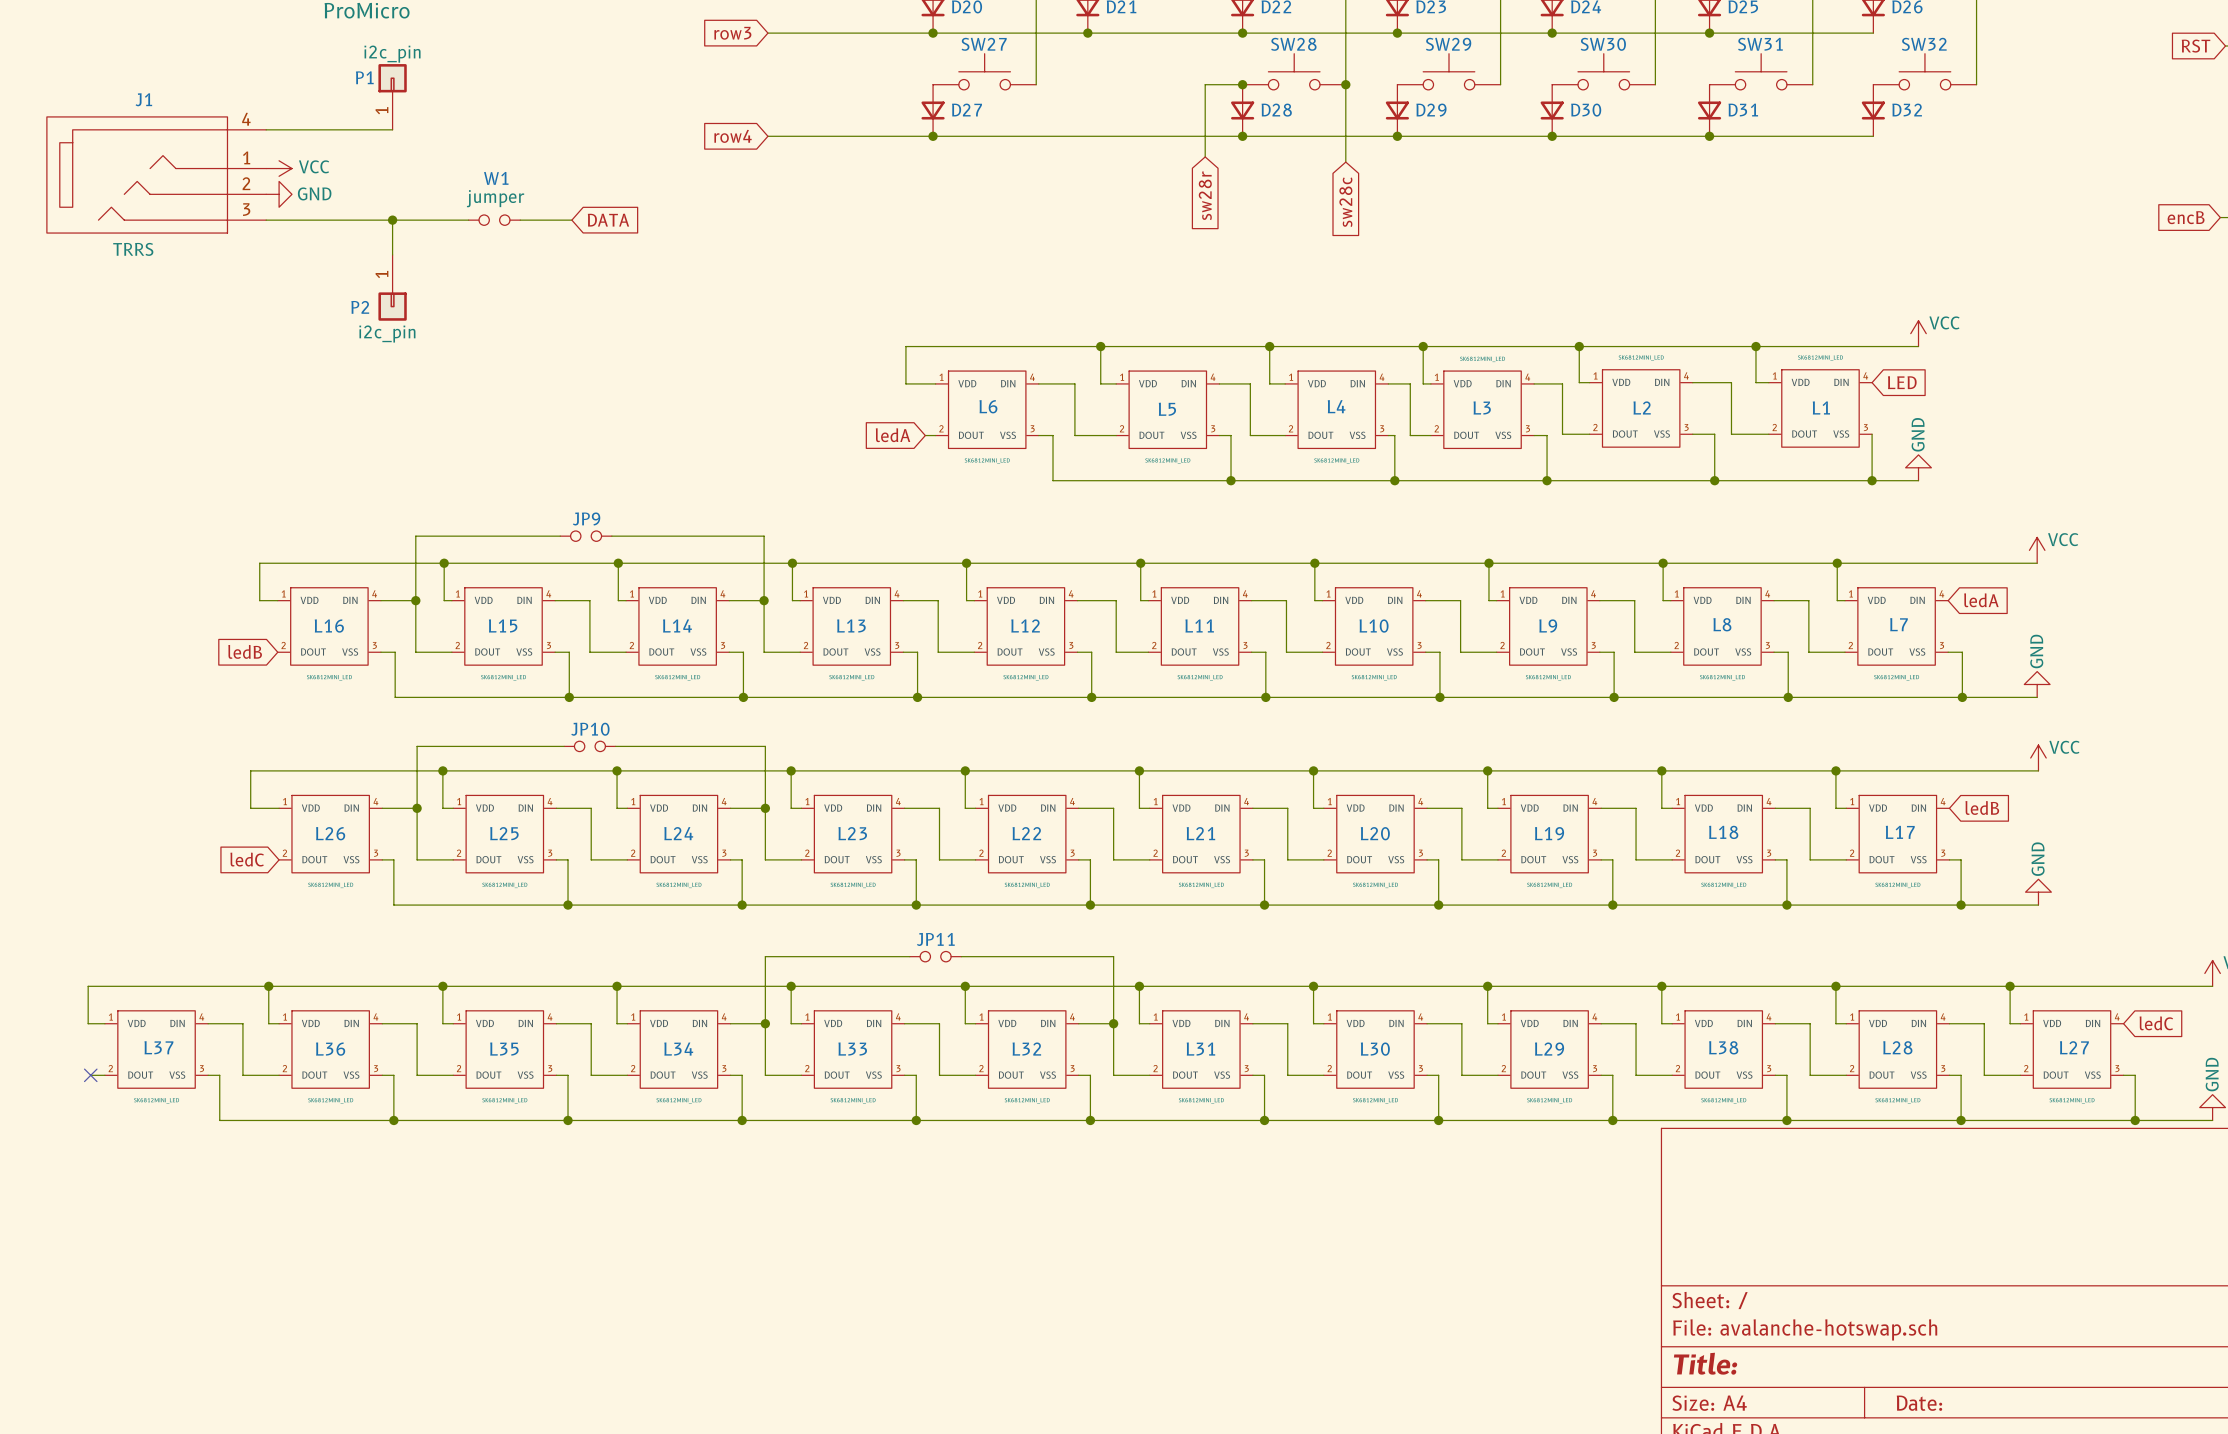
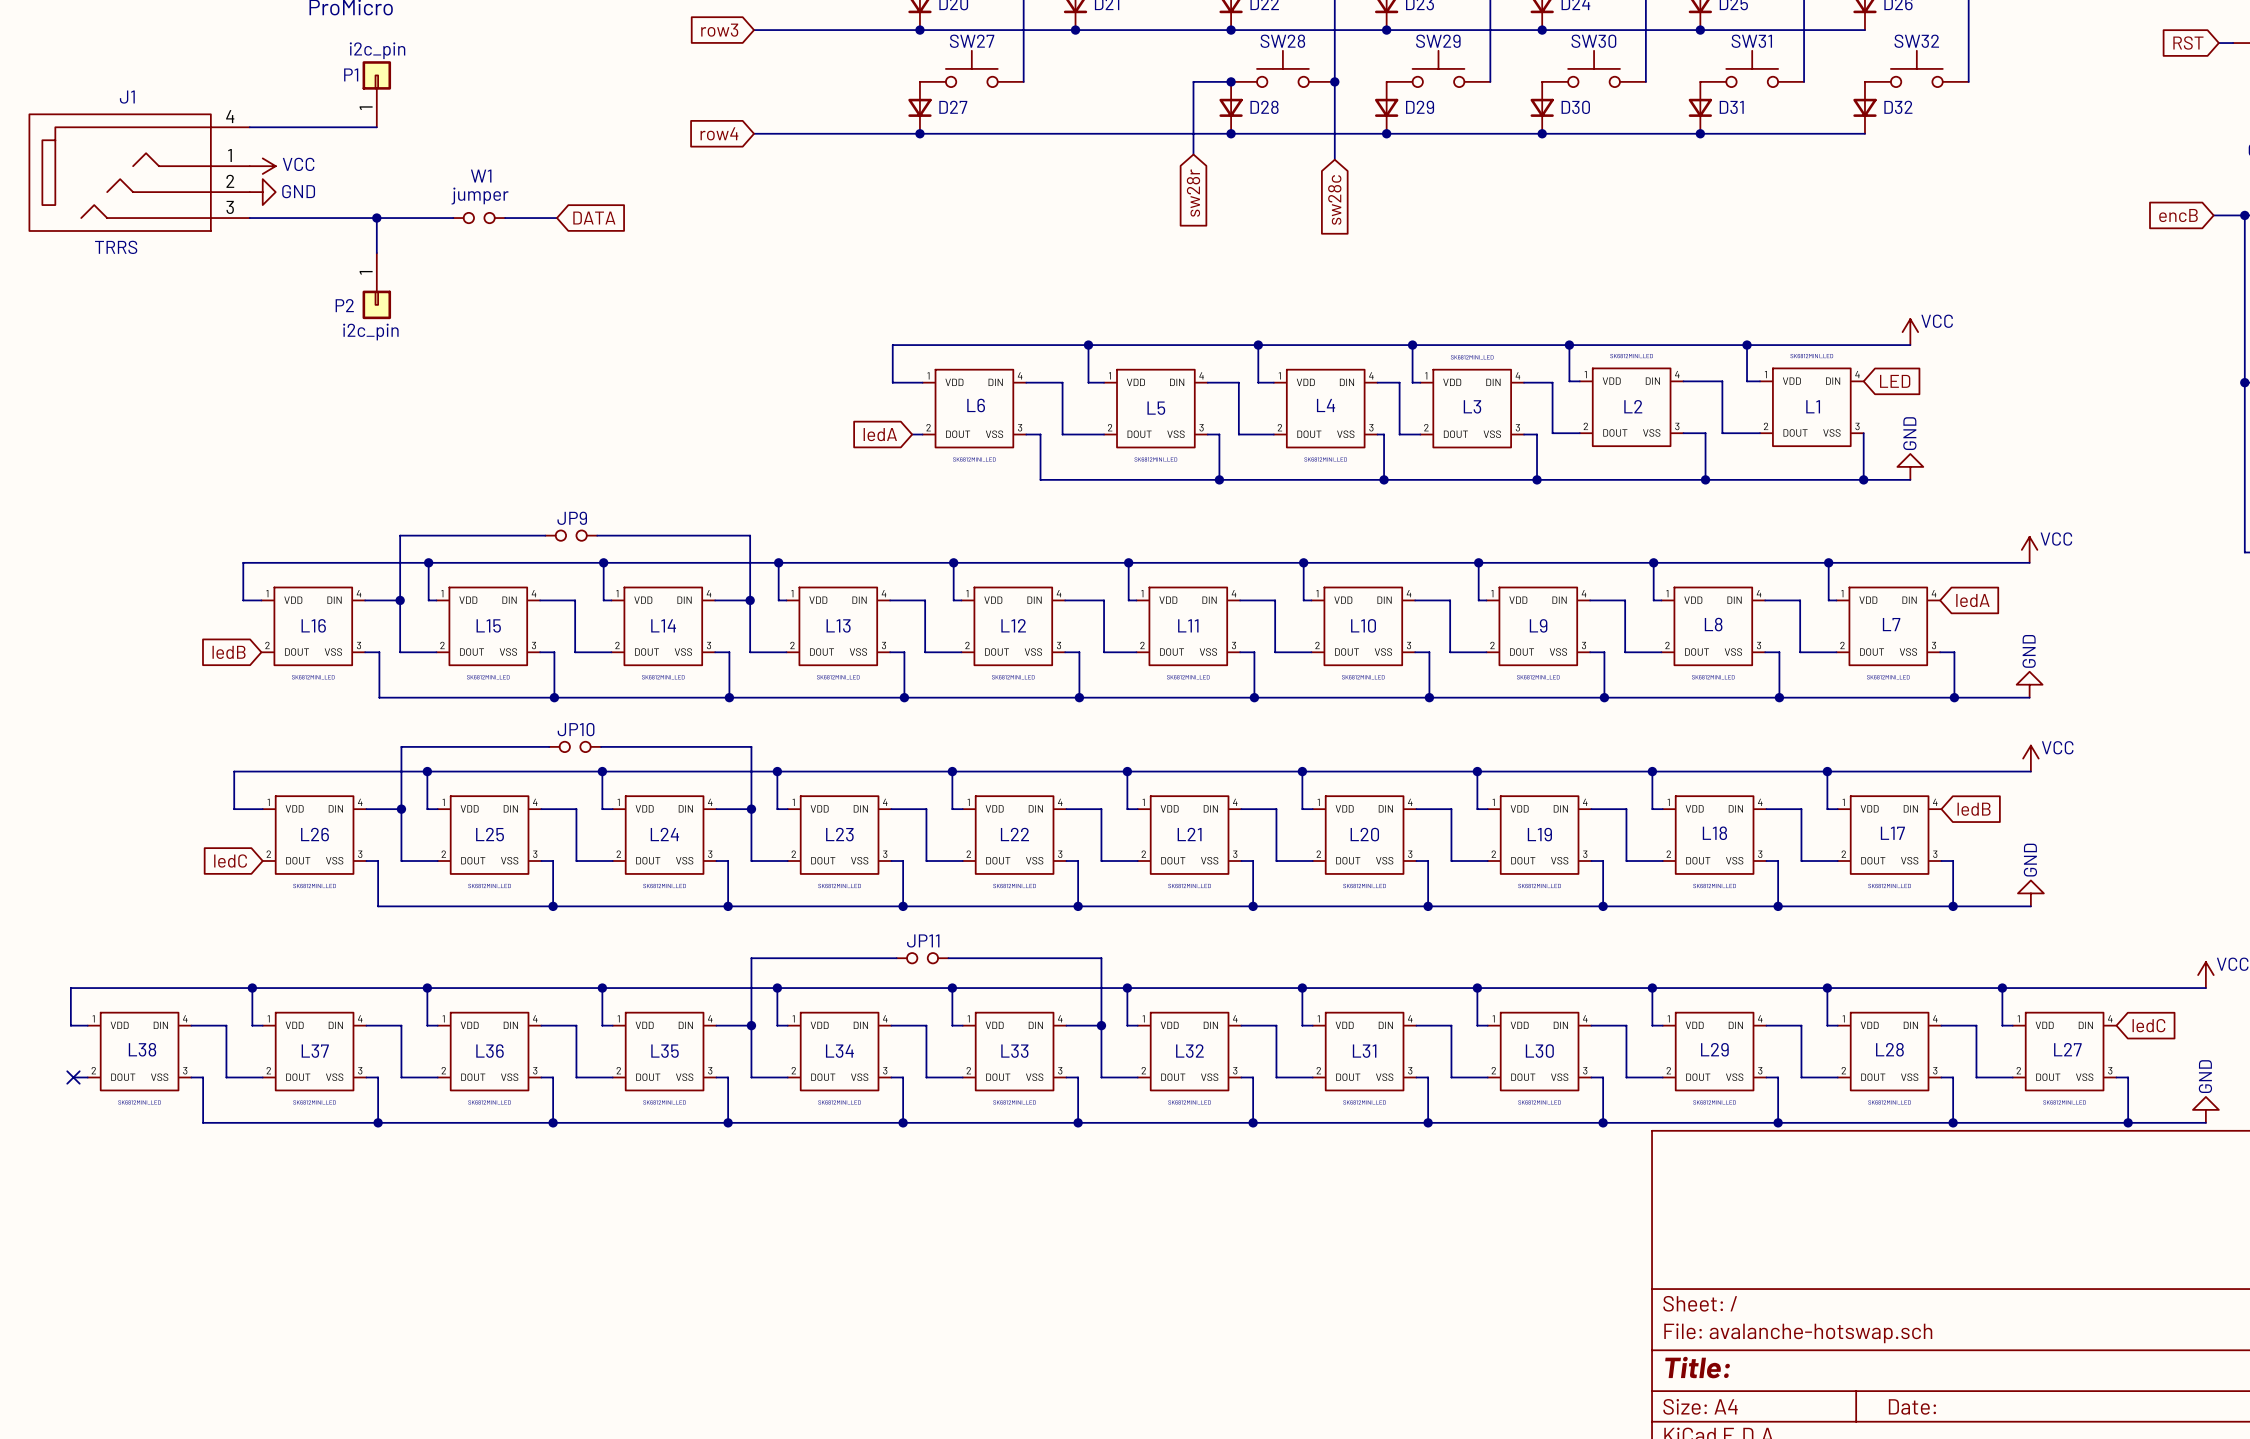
L37 name: L37 (158, 1047) -> L38 (142, 1049)
L38 name: L38 (1723, 1047) -> L29 (1714, 1049)
L36 name: L36 (330, 1049) -> L37 (315, 1051)
L35 name: L35 (504, 1049) -> L36 (490, 1051)
L34 name: L34 (678, 1049) -> L35 (665, 1051)
L33 name: L33 (852, 1049) -> L34 (839, 1051)
L32 name: L32 (1026, 1049) -> L33 (1014, 1051)
L31 name: L31 (1200, 1049) -> L32 (1189, 1051)
L30 name: L30 (1375, 1049) -> L31 (1364, 1051)
L29 name: L29 (1549, 1049) -> L30 (1539, 1051)

